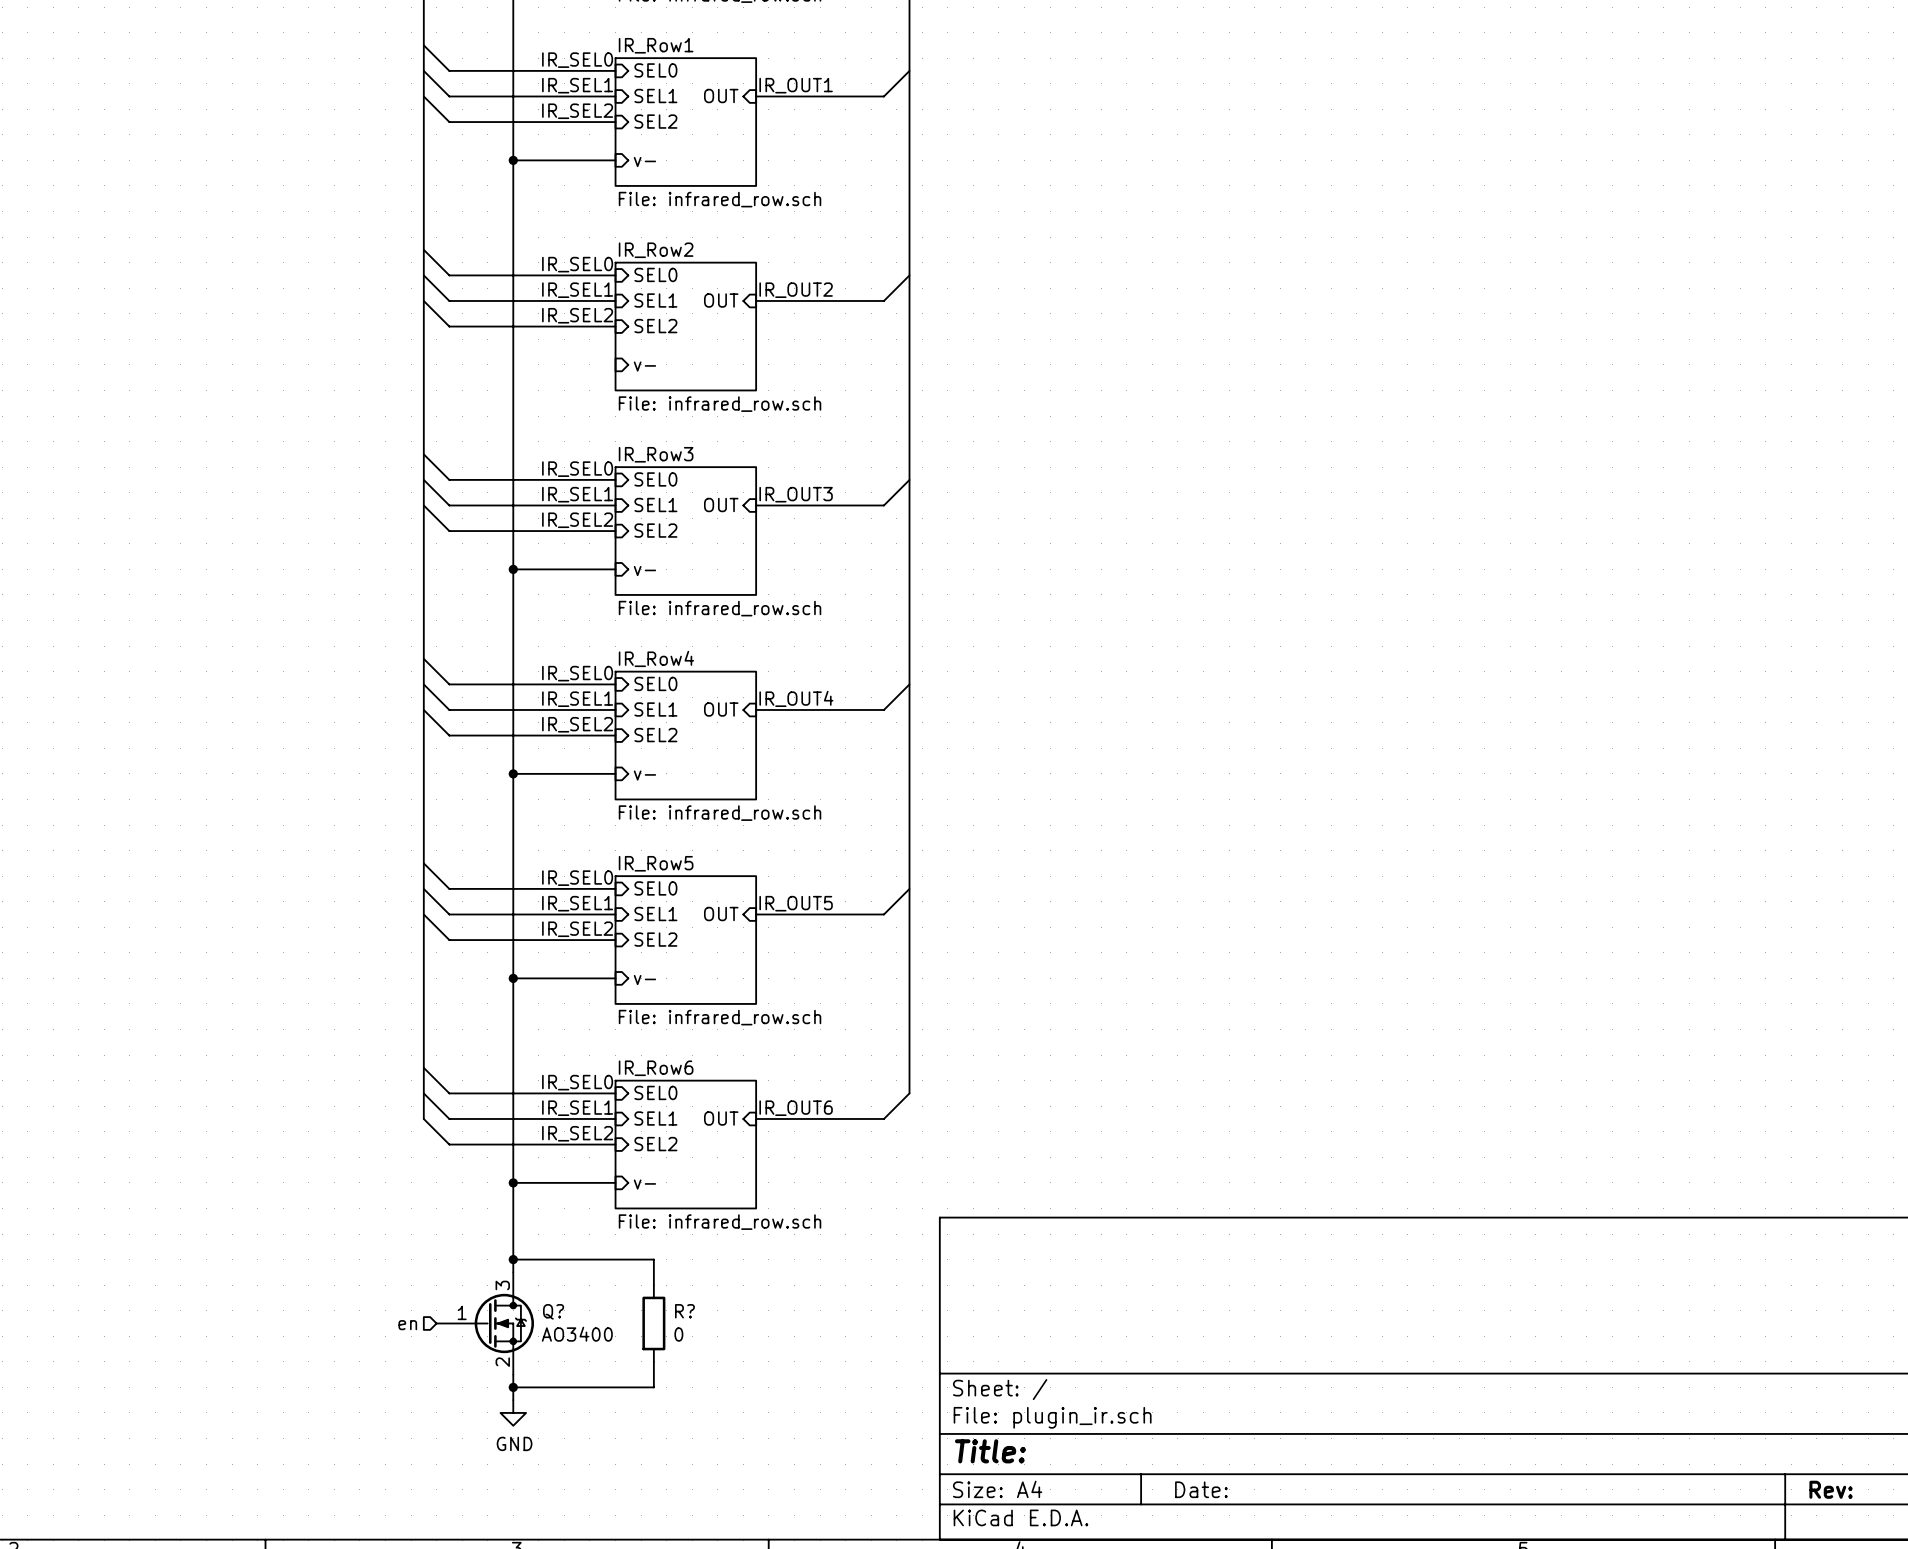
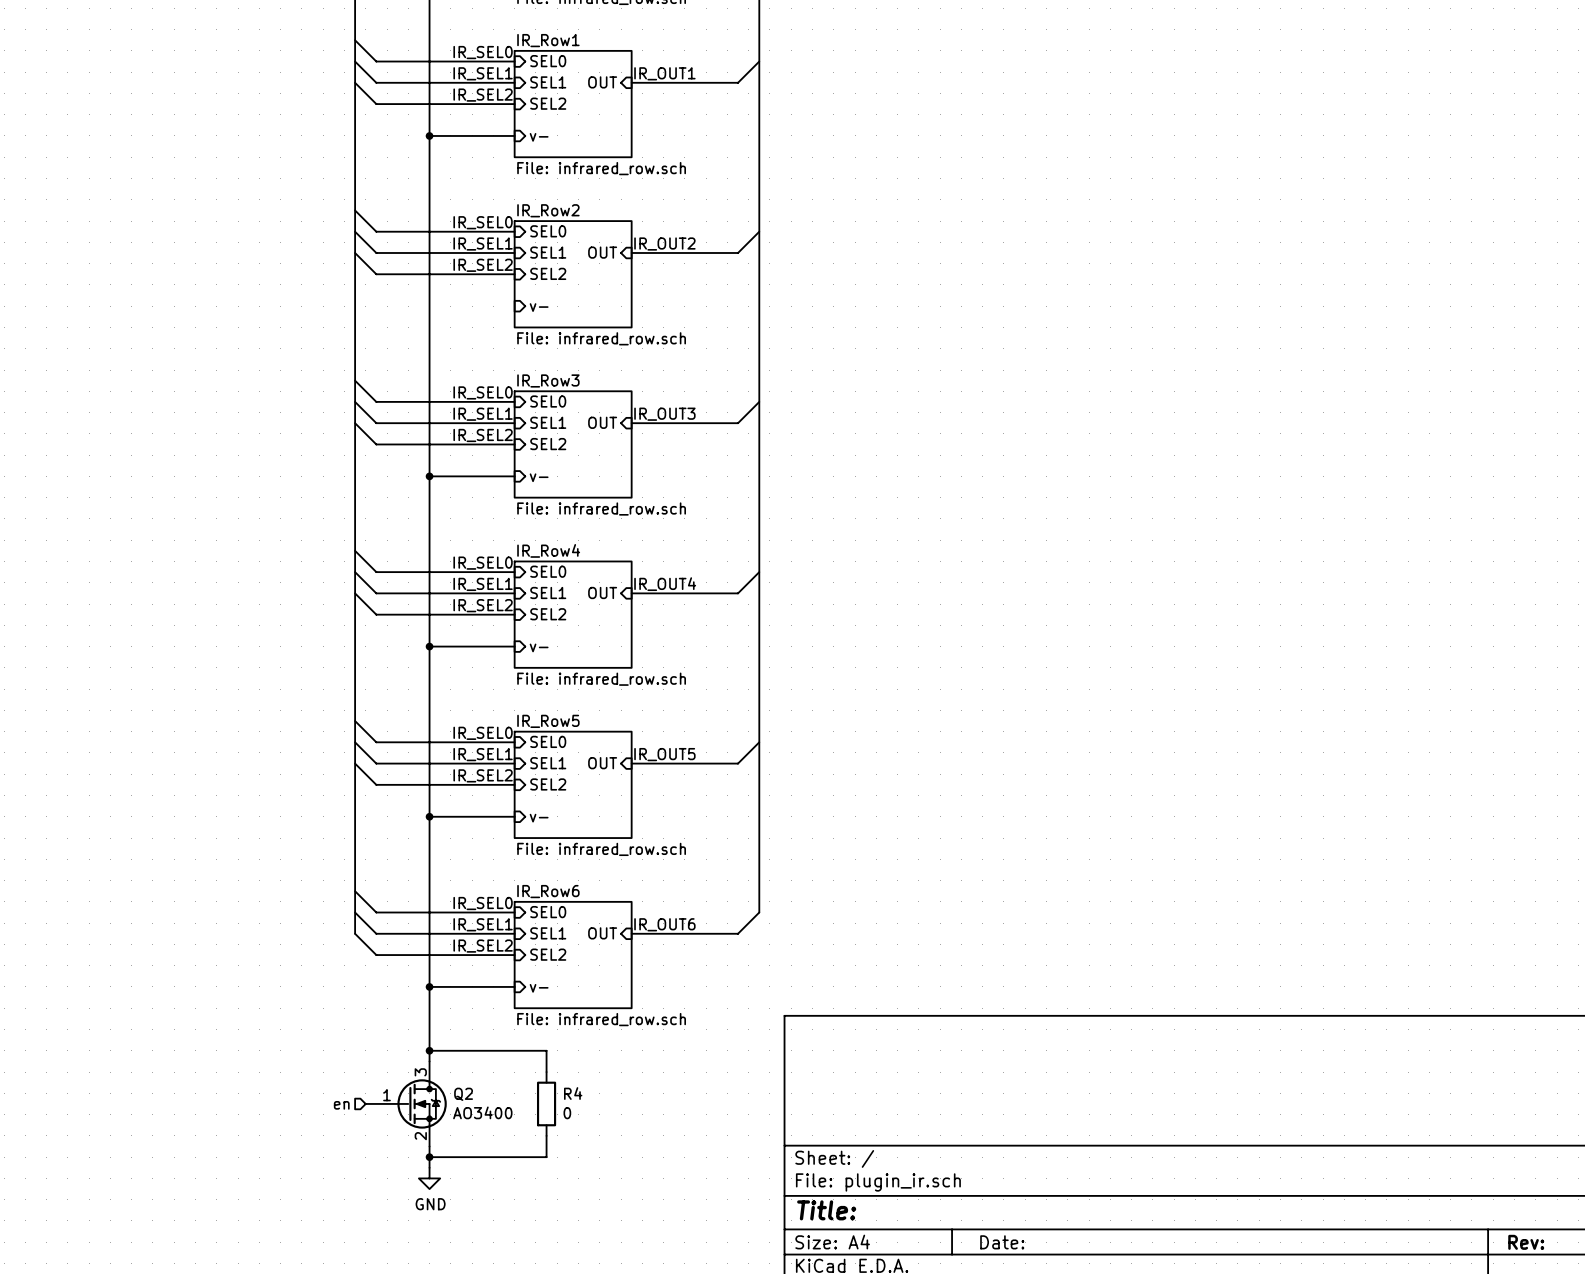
Q? name: Q? (553, 1311) -> Q2 (463, 1094)
R? name: R? (684, 1311) -> R4 (573, 1093)

